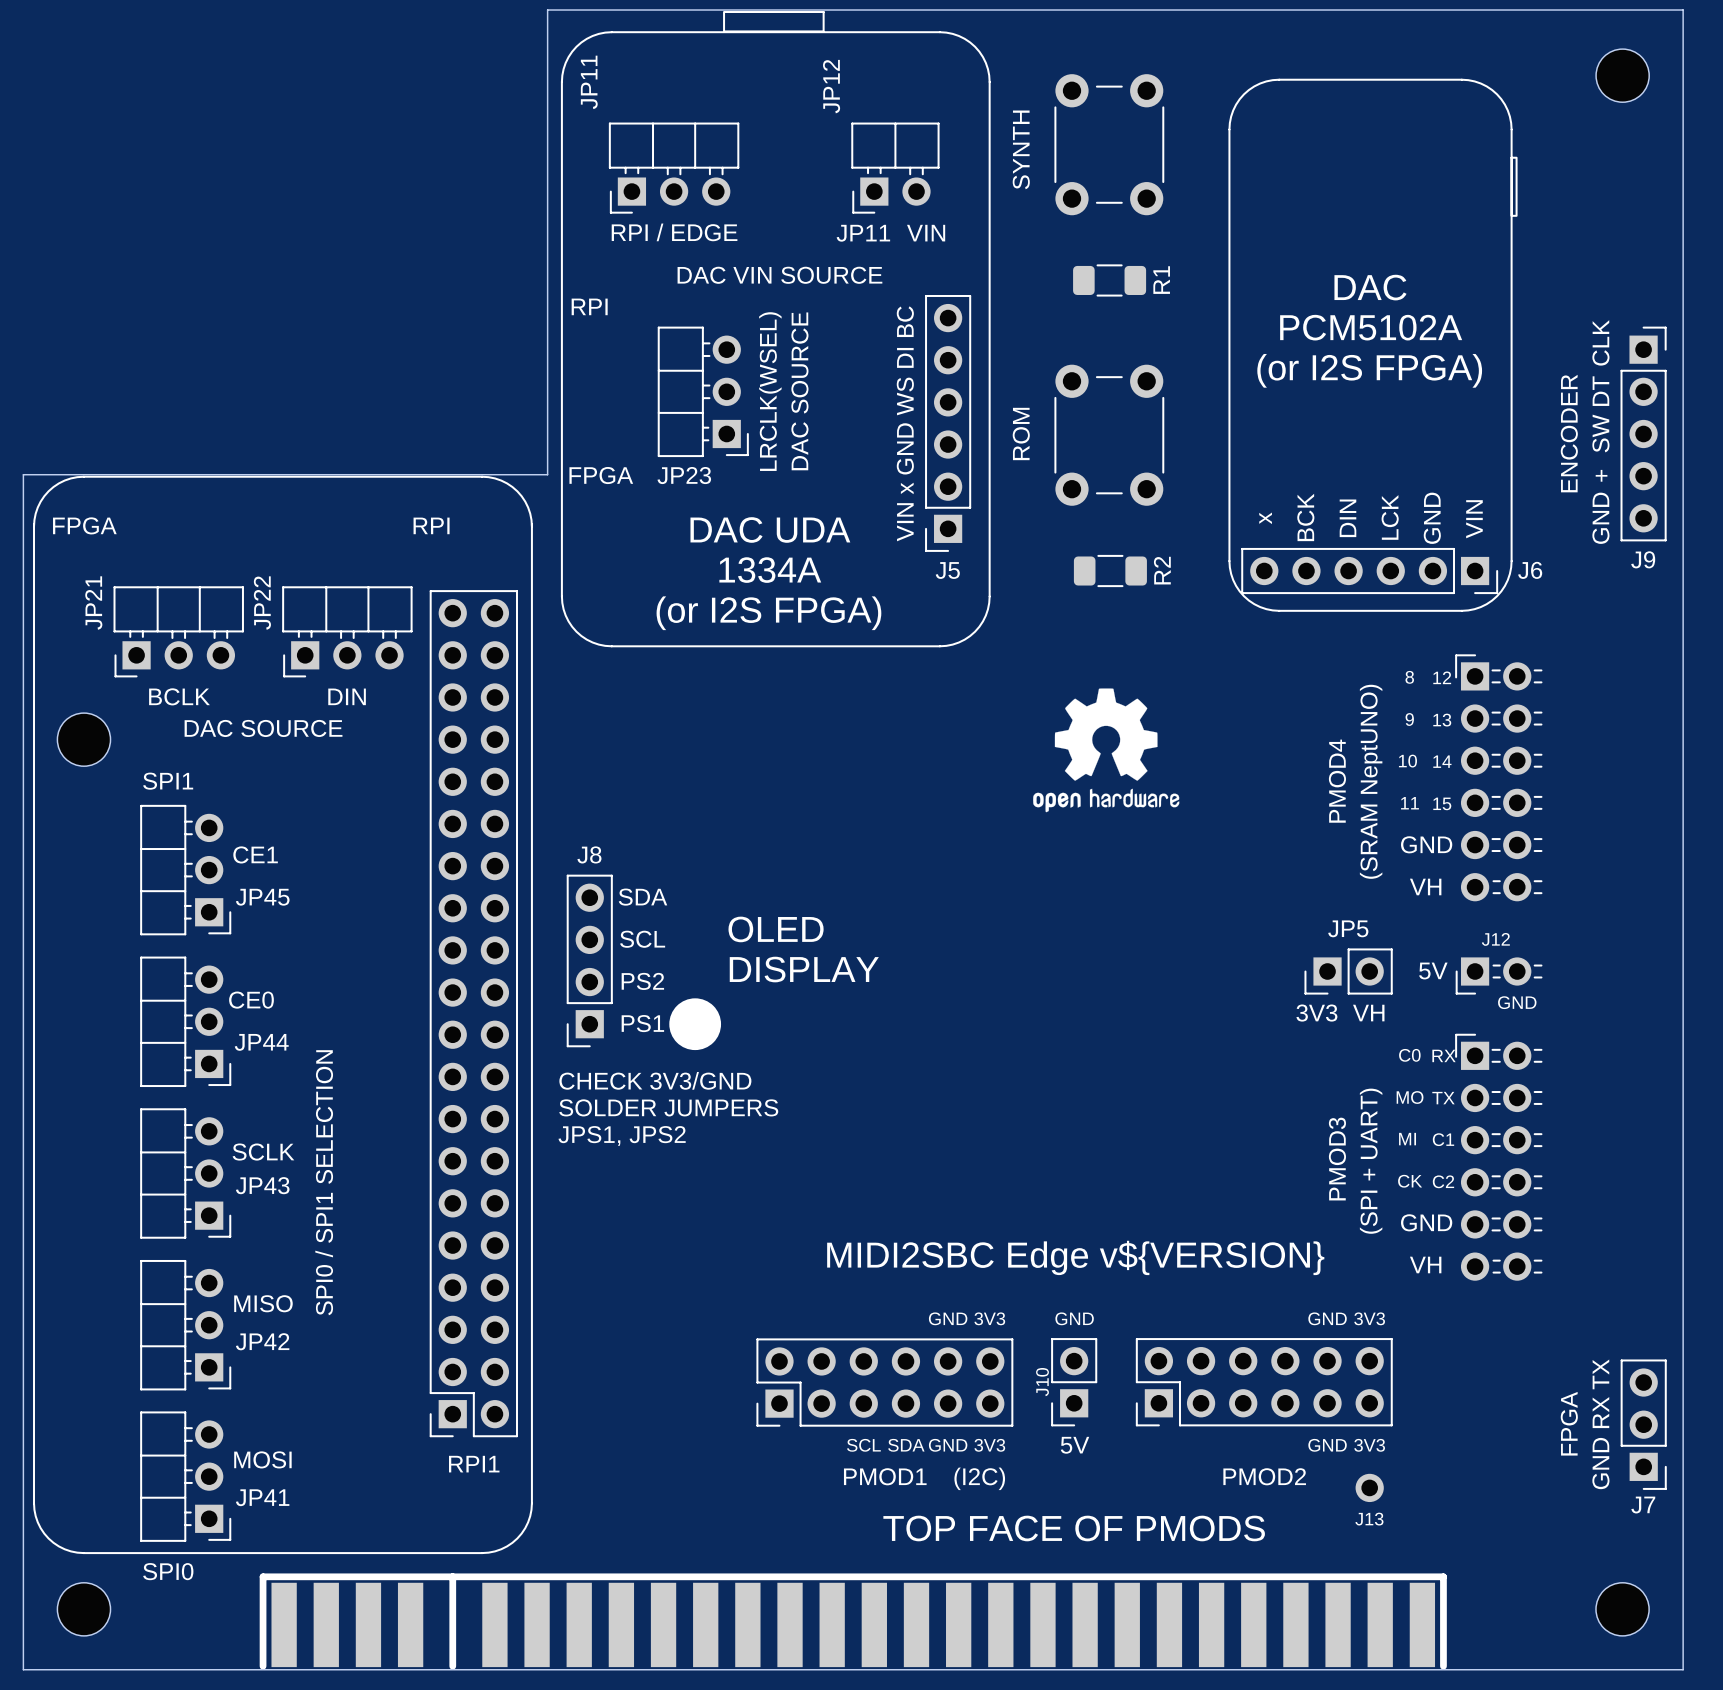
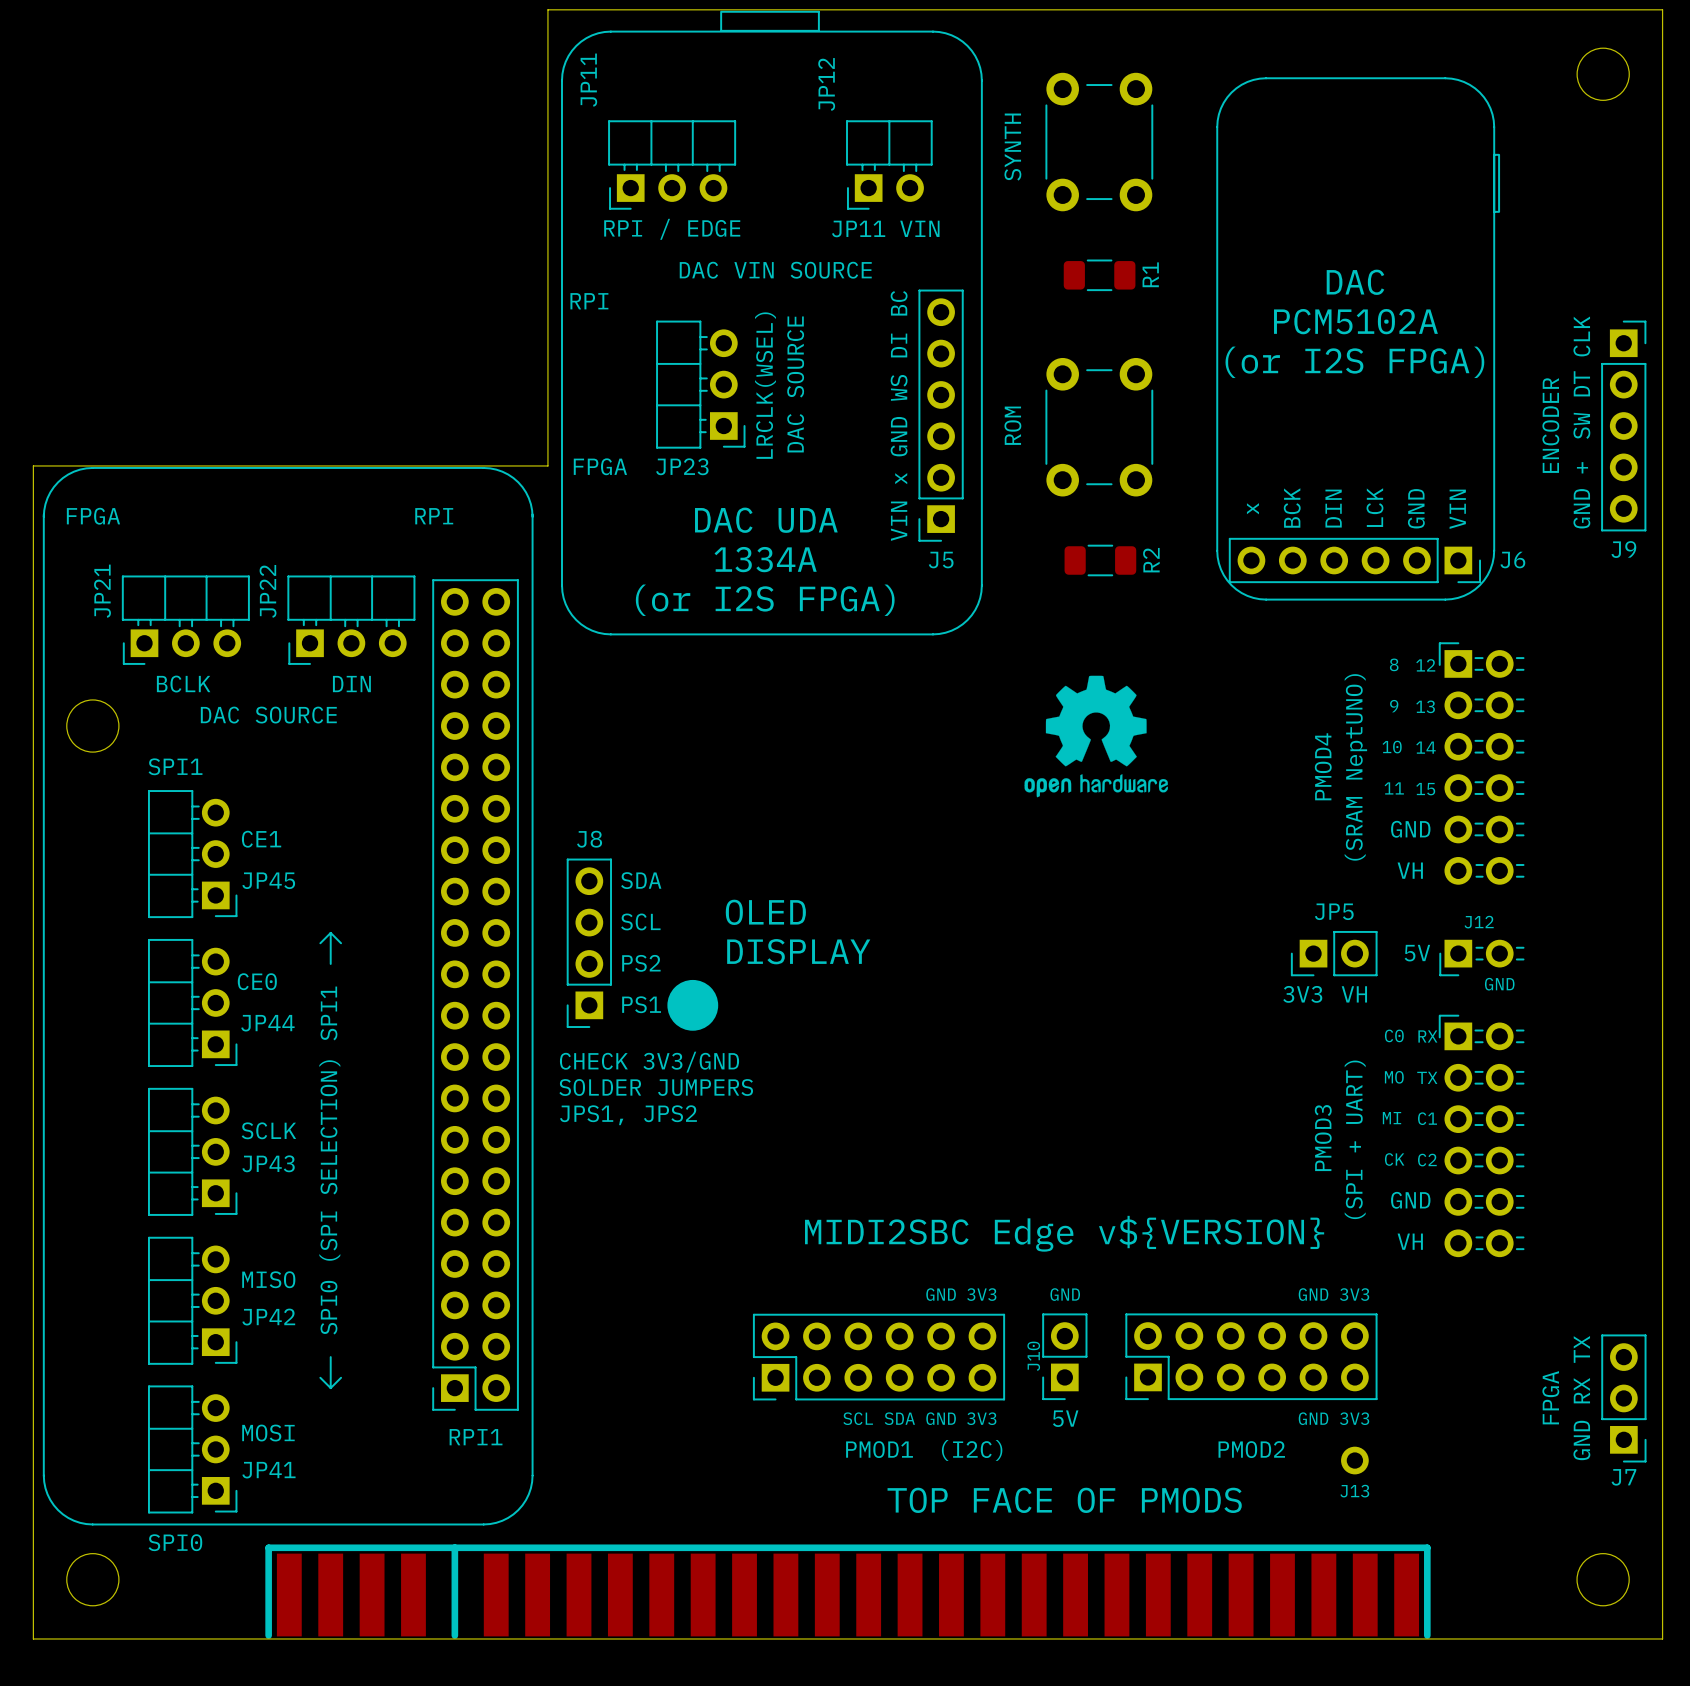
line: none -> (330, 932) (341, 943)
line: none -> (330, 932) (330, 963)
line: none -> (330, 932) (320, 943)
text: SPI0 / SPI1 SELECTION (324, 1182) -> SPI0 (SPI SELECTION) SPI1 (329, 1160)
line: none -> (330, 1357) (330, 1388)
line: none -> (320, 1377) (330, 1388)
line: none -> (341, 1377) (330, 1388)

